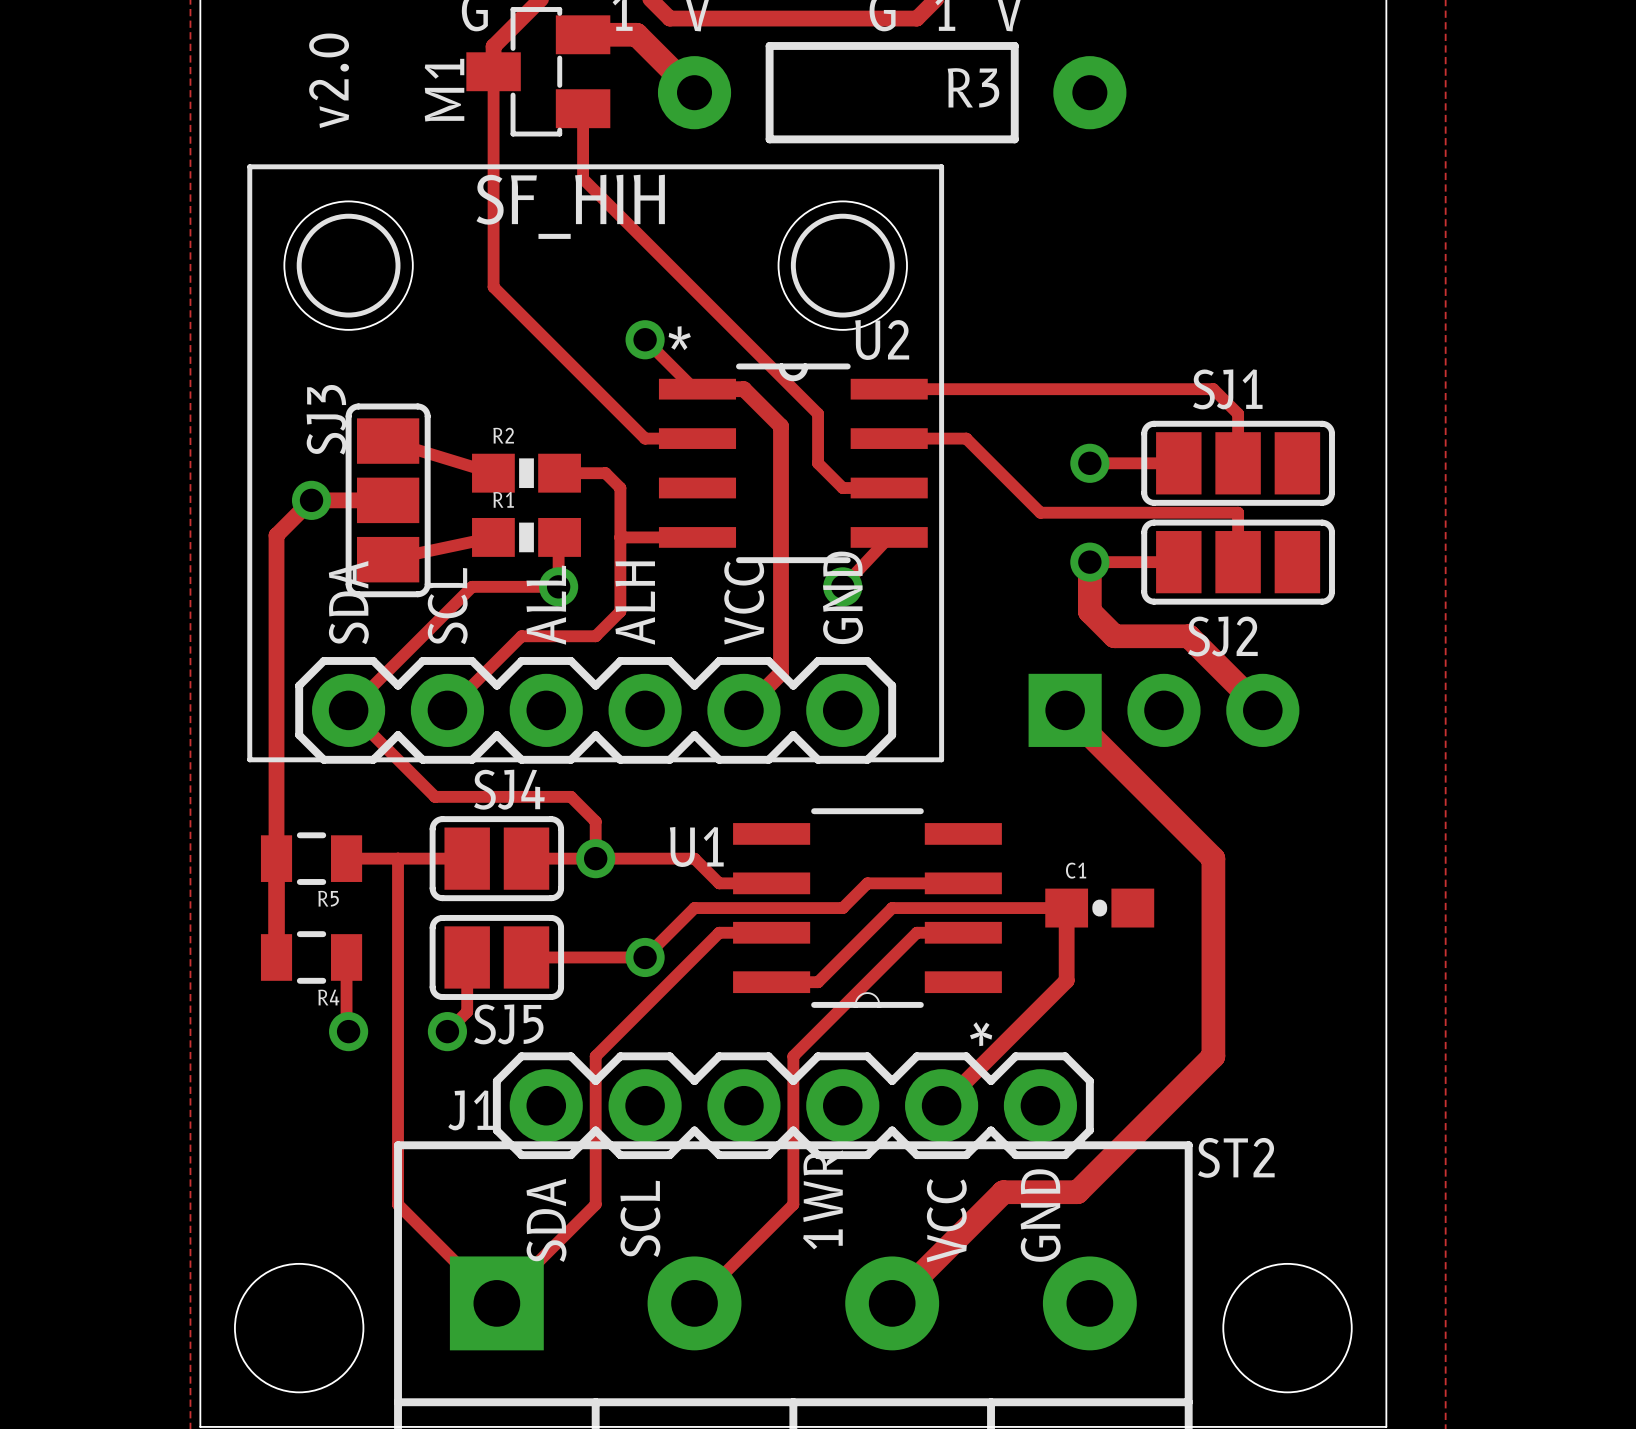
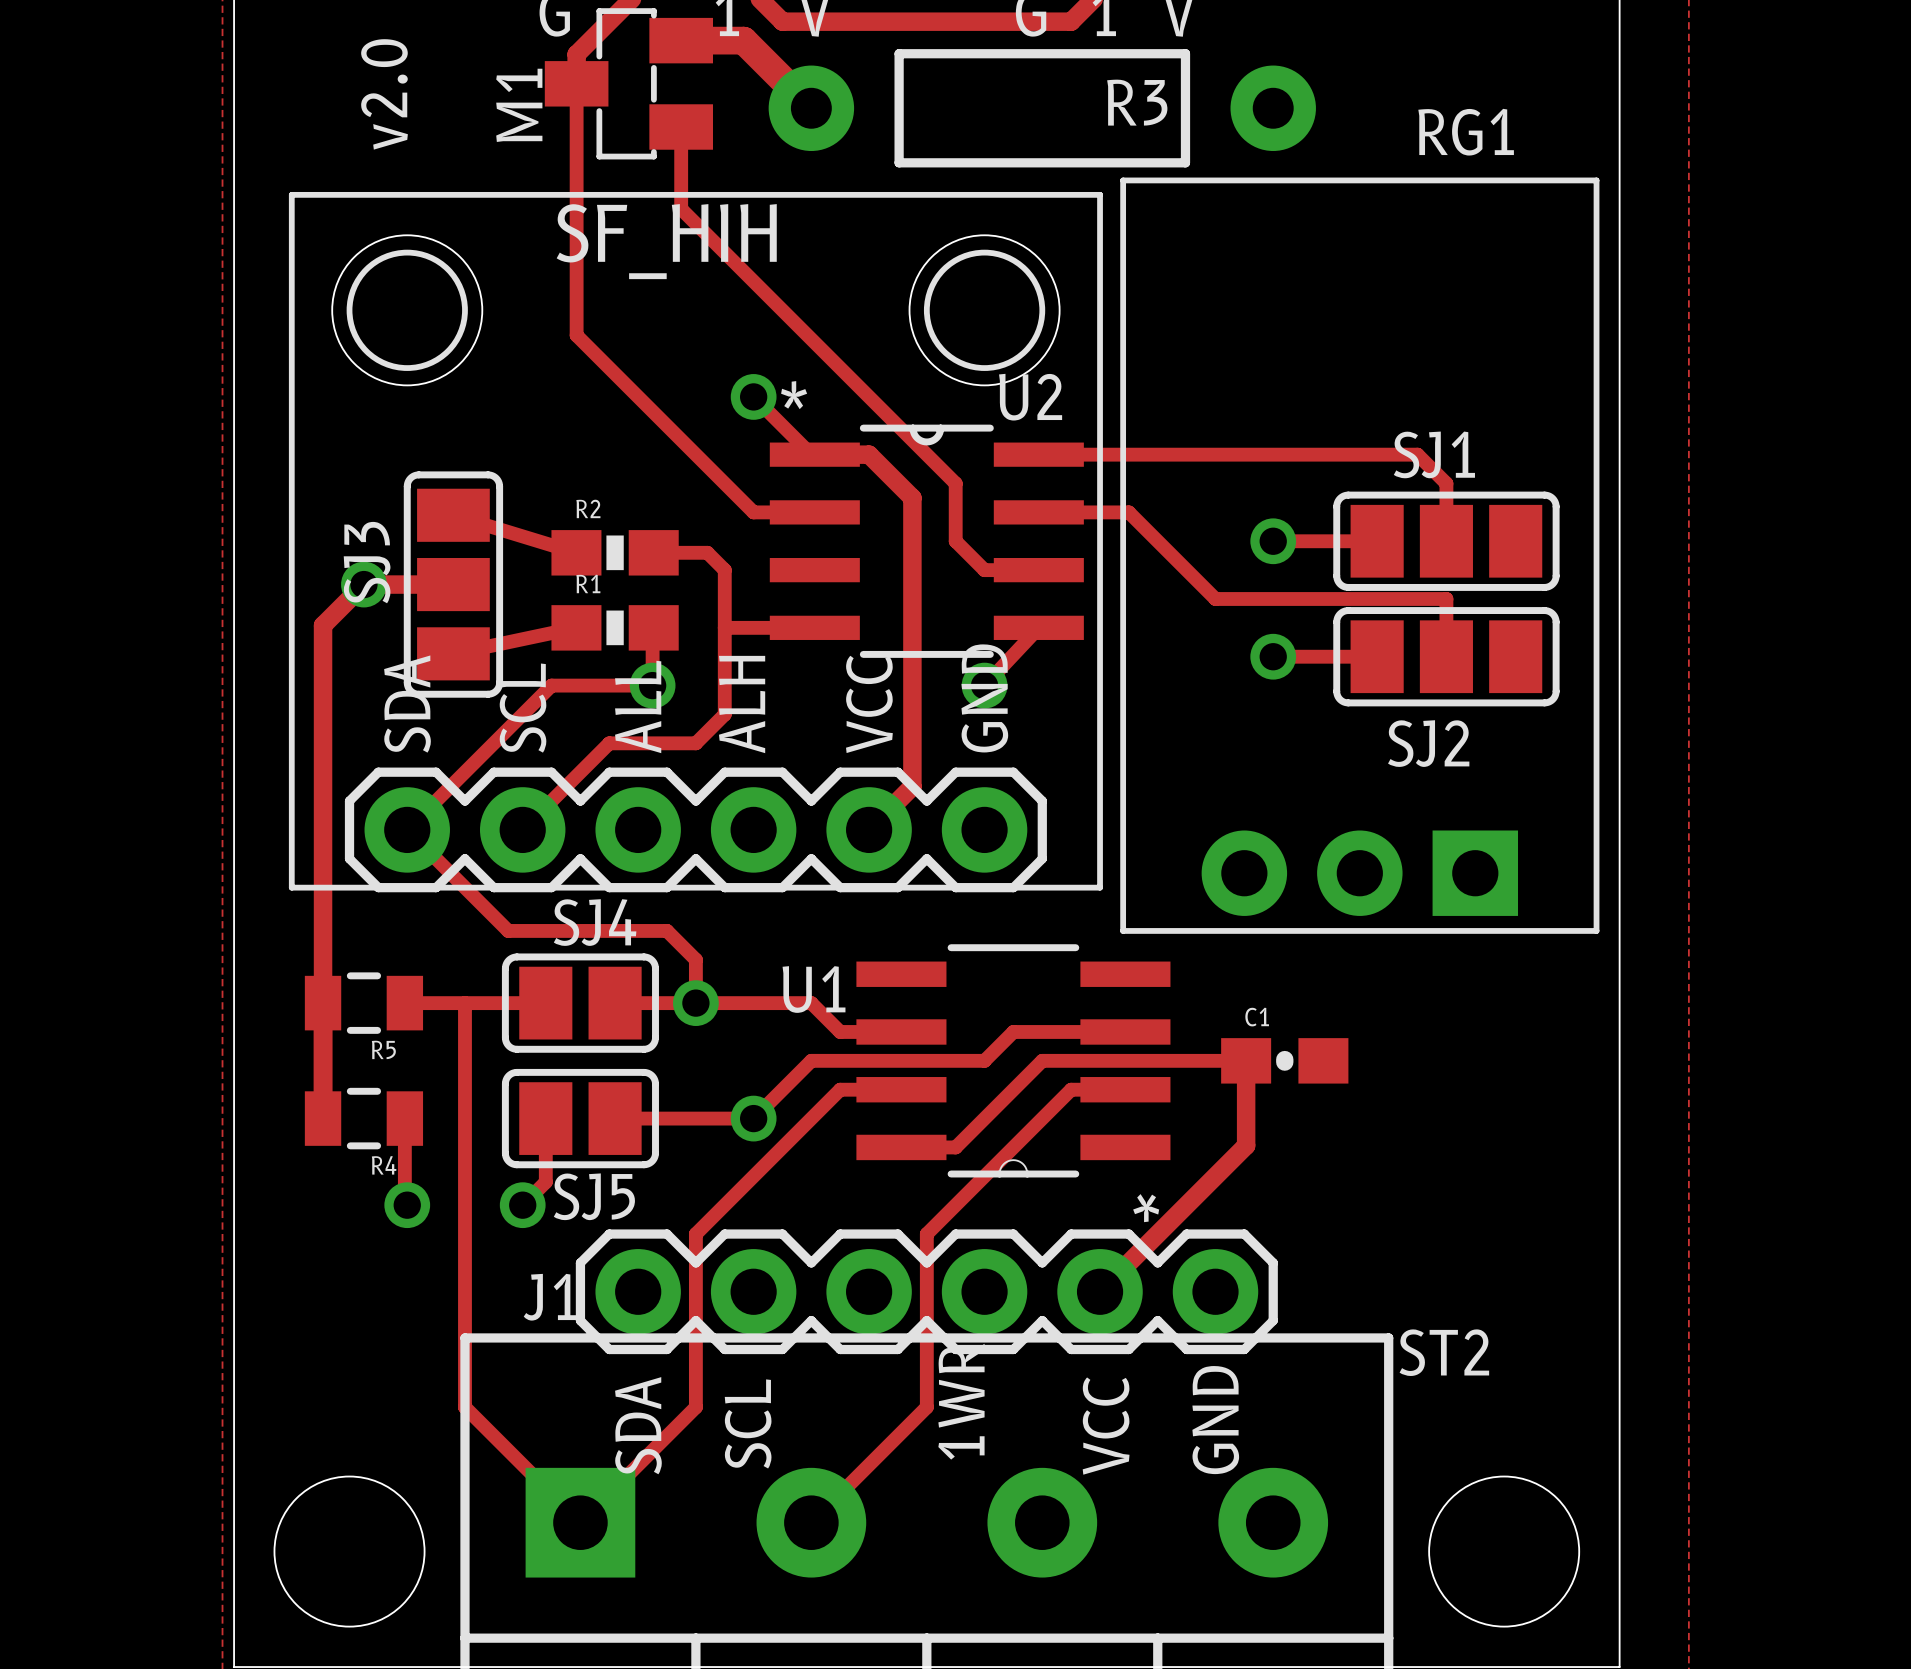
SJ3 name position: SJ3 (326, 419) -> SJ3 (367, 562)
track: (1089, 562) (1089, 611) (1114, 636) (1188, 636) (1262, 710) -> none
track: (1065, 710) (1213, 858) (1213, 1056) (1077, 1192) (1003, 1192) (892, 1303) -> none
RG1 side: bottom (1163, 710) -> top (1359, 555)

